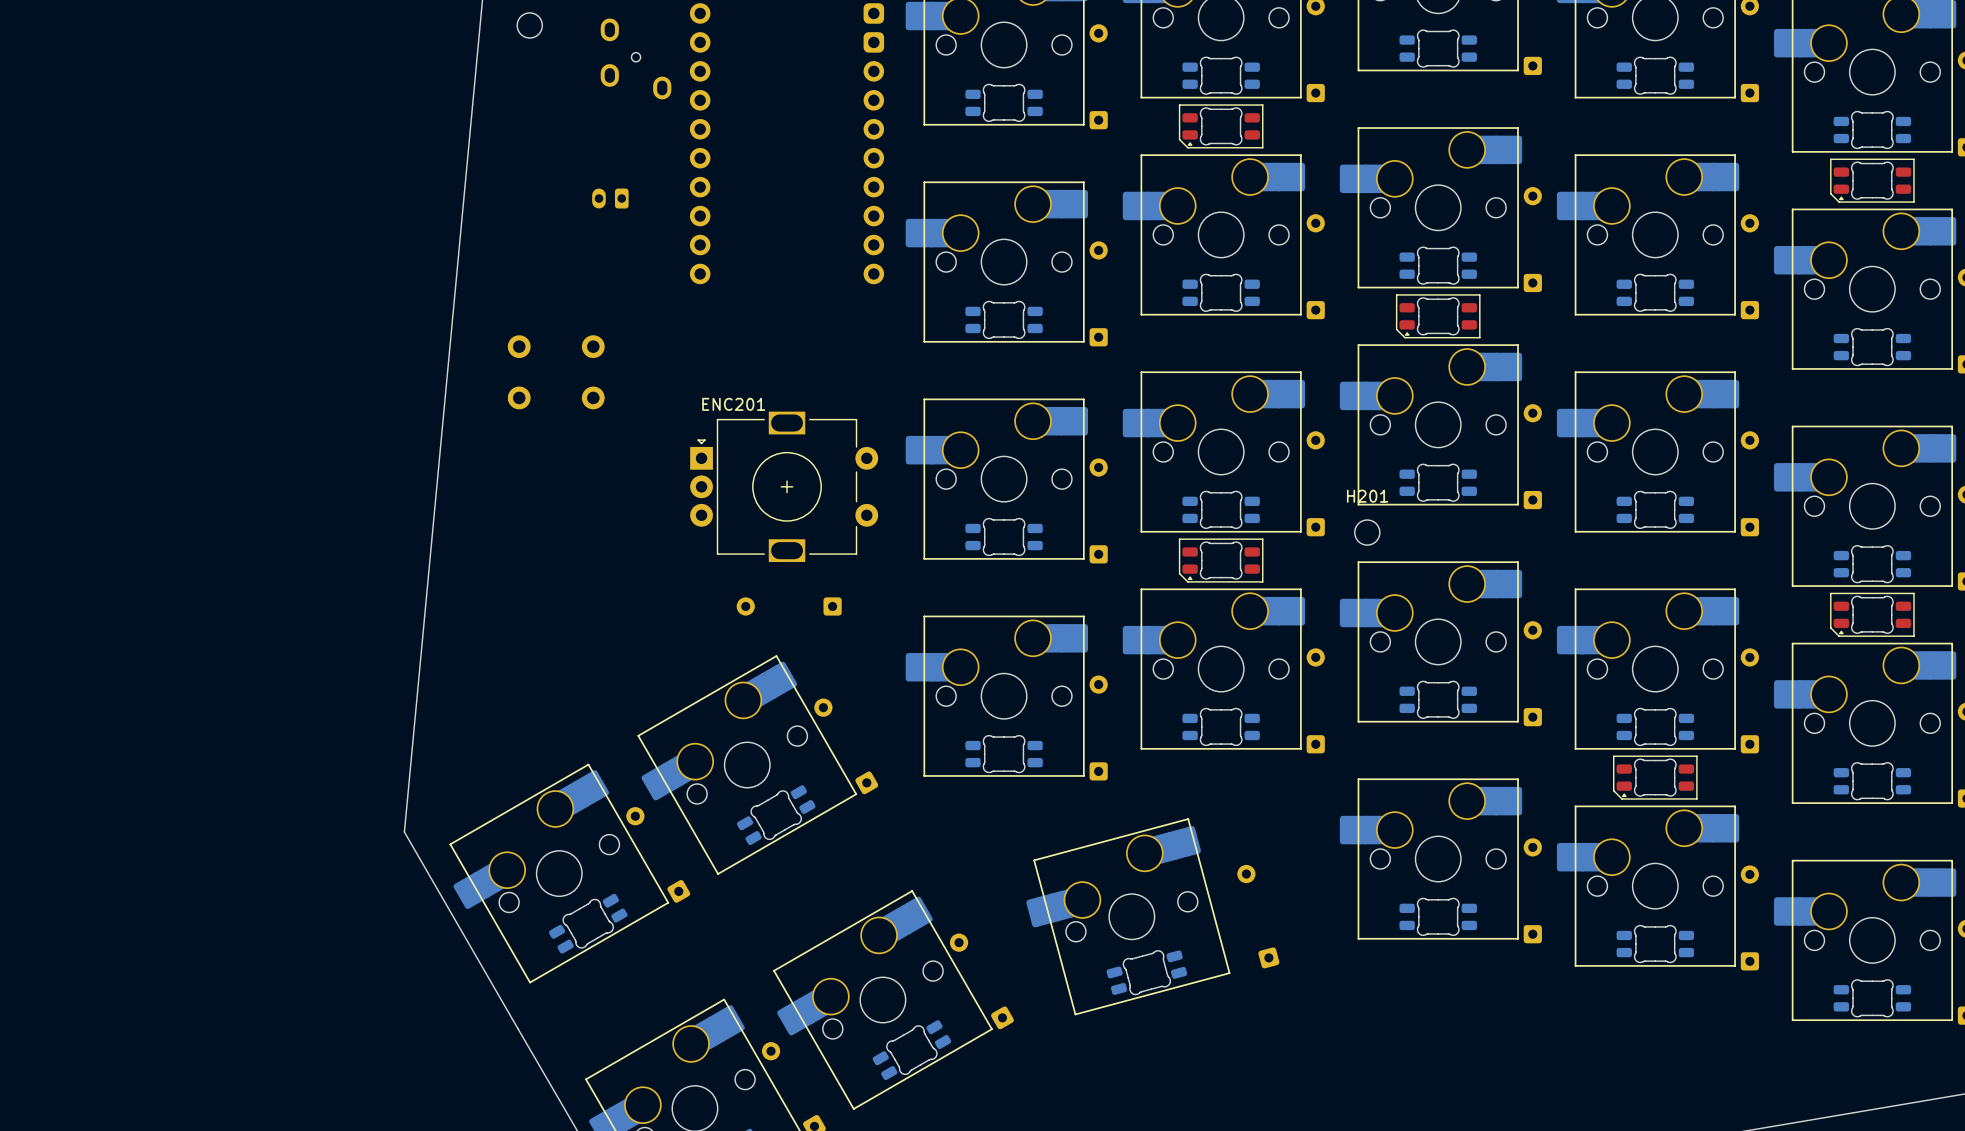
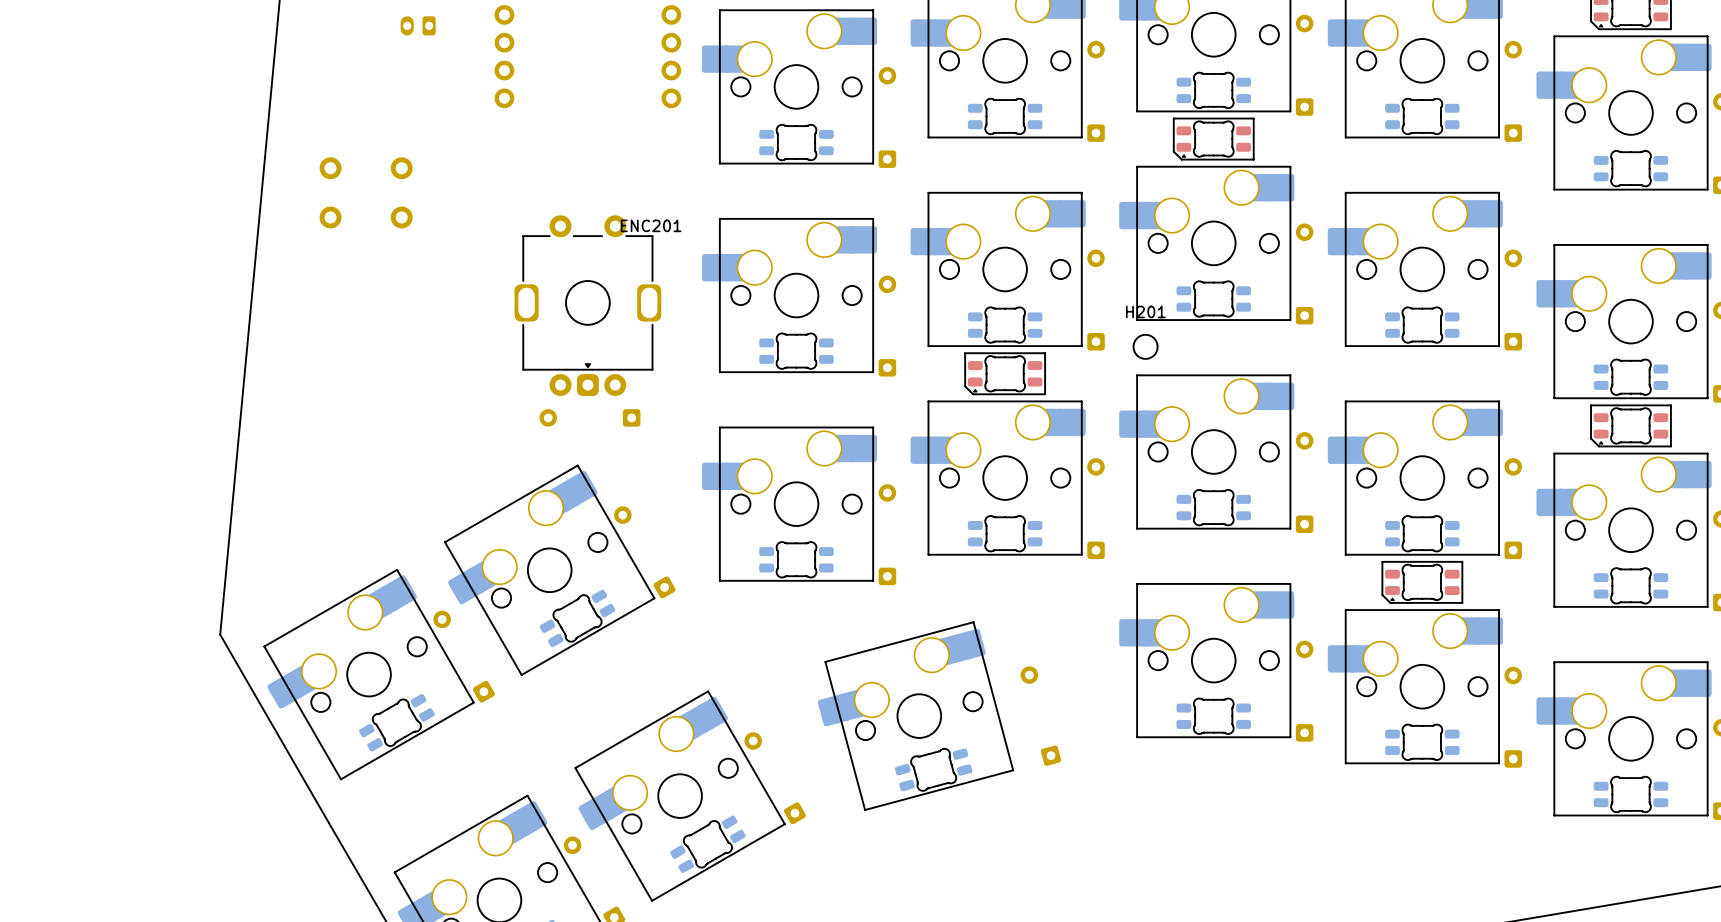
ENC201 name position: ENC201 (733, 404) -> ENC201 (651, 225)
ENC201 footprint: [690, 411, 879, 563] -> [514, 215, 662, 397]

